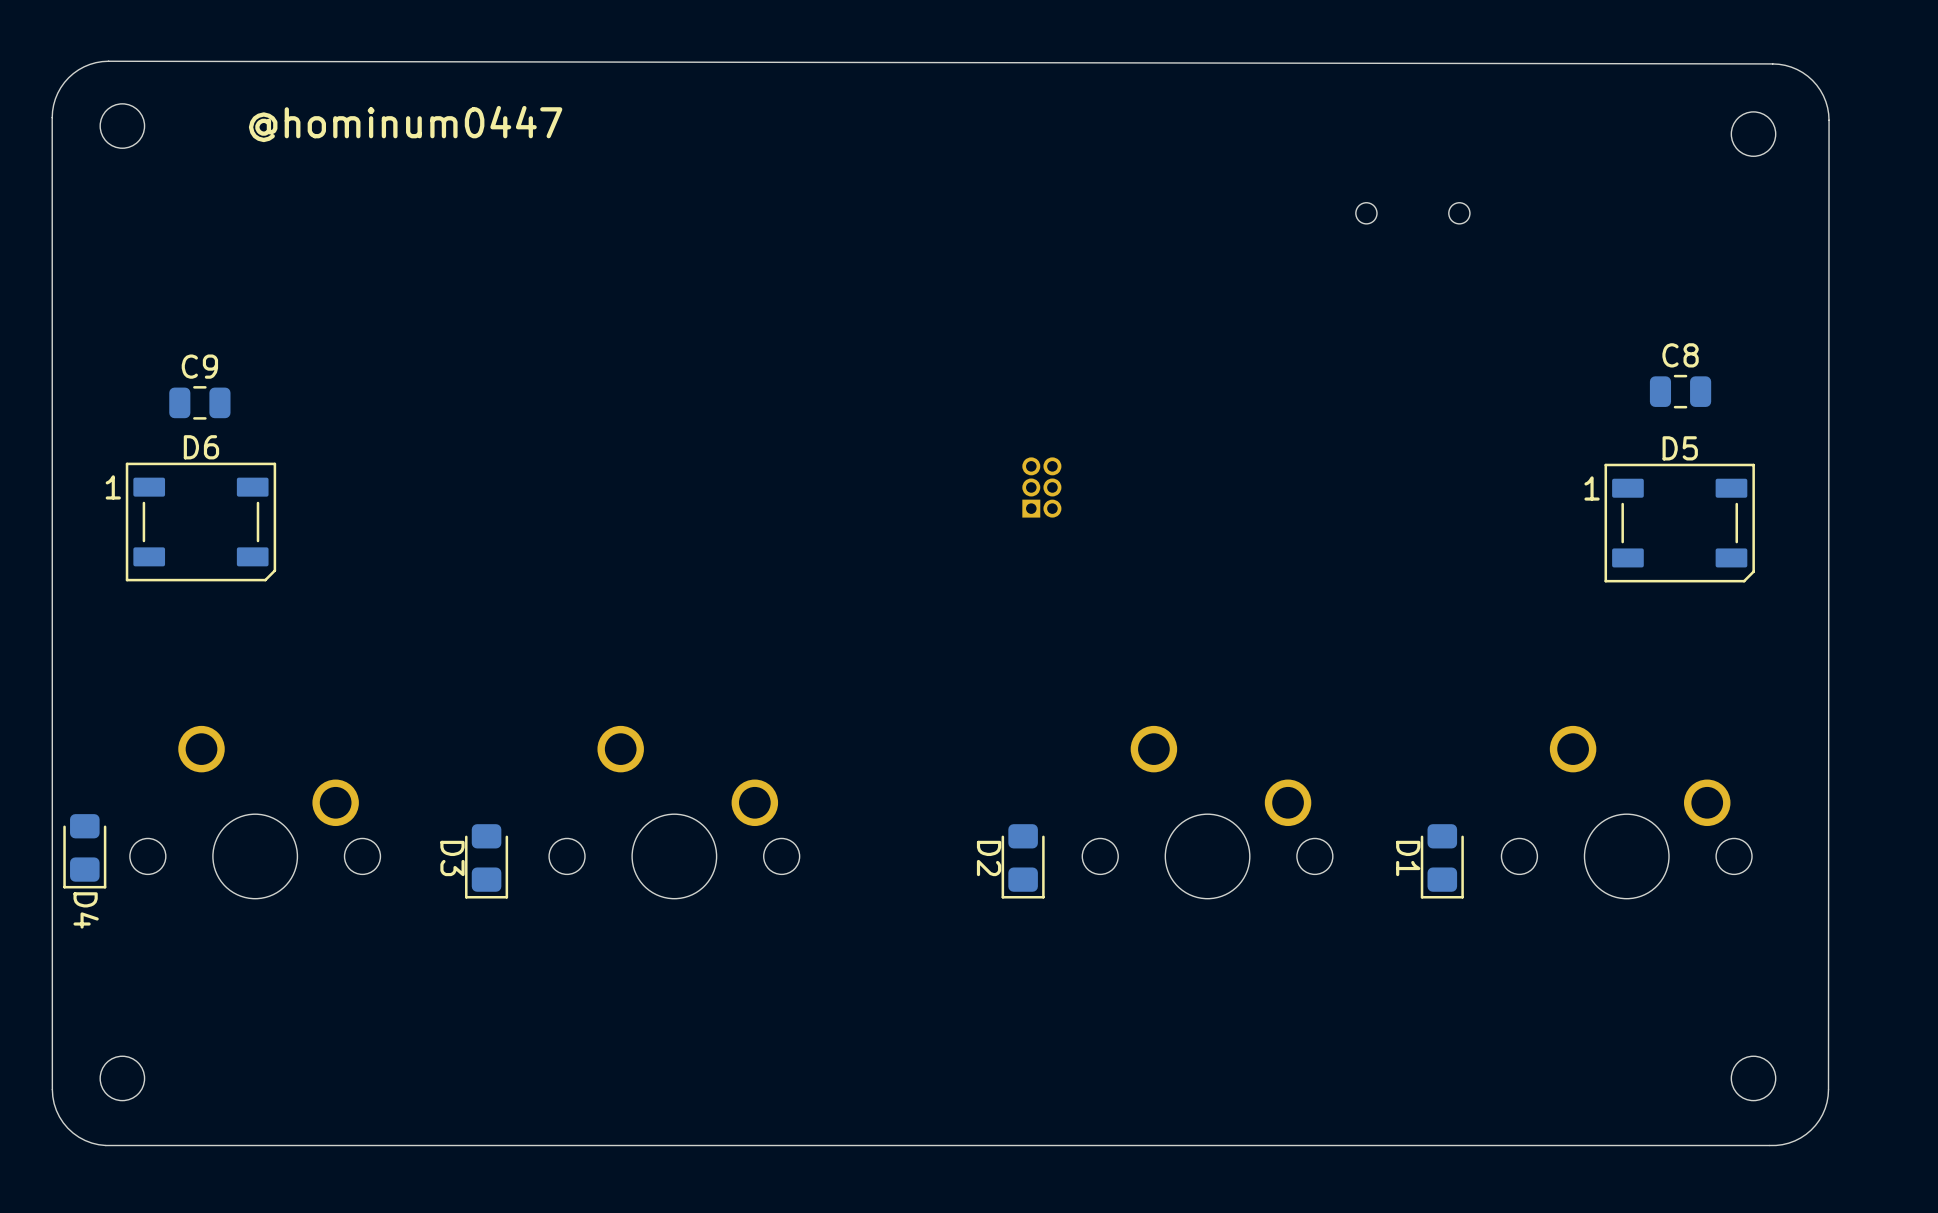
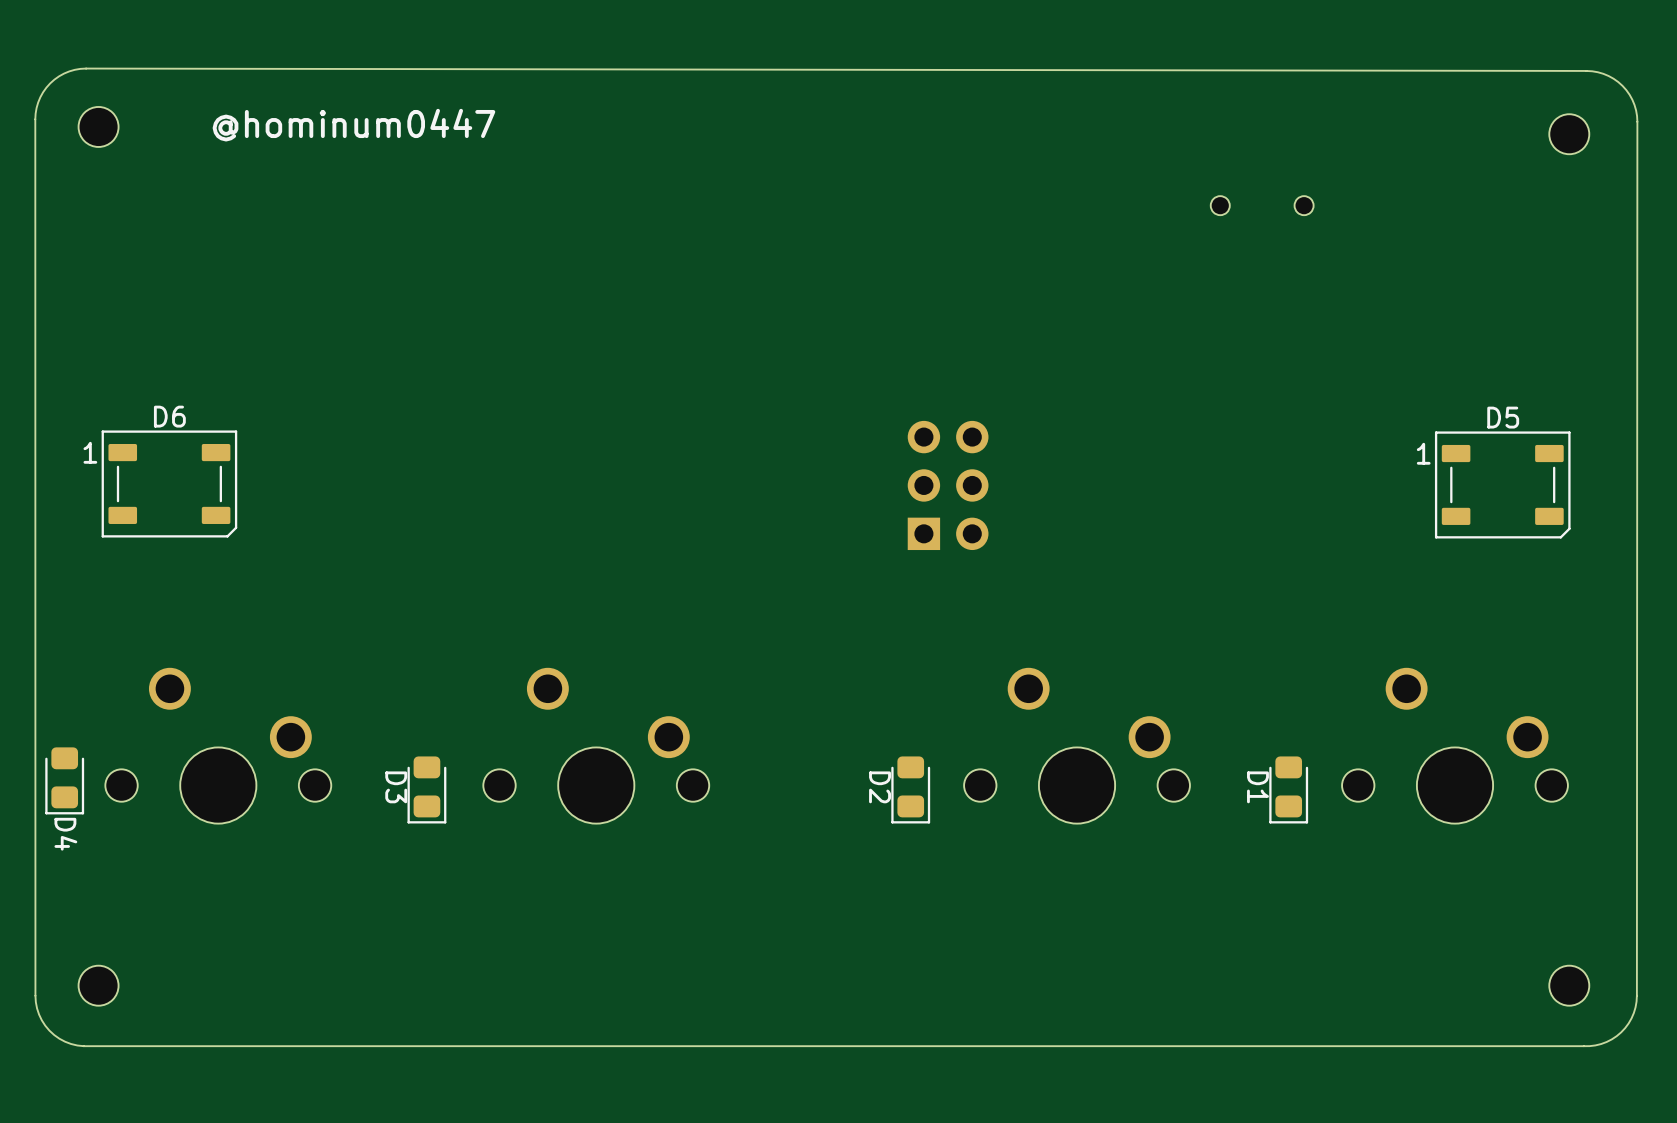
C8: (1680, 391) -> none
C9: (199, 402) -> none
part: (1041, 487) -> none
part: none -> (948, 485)

